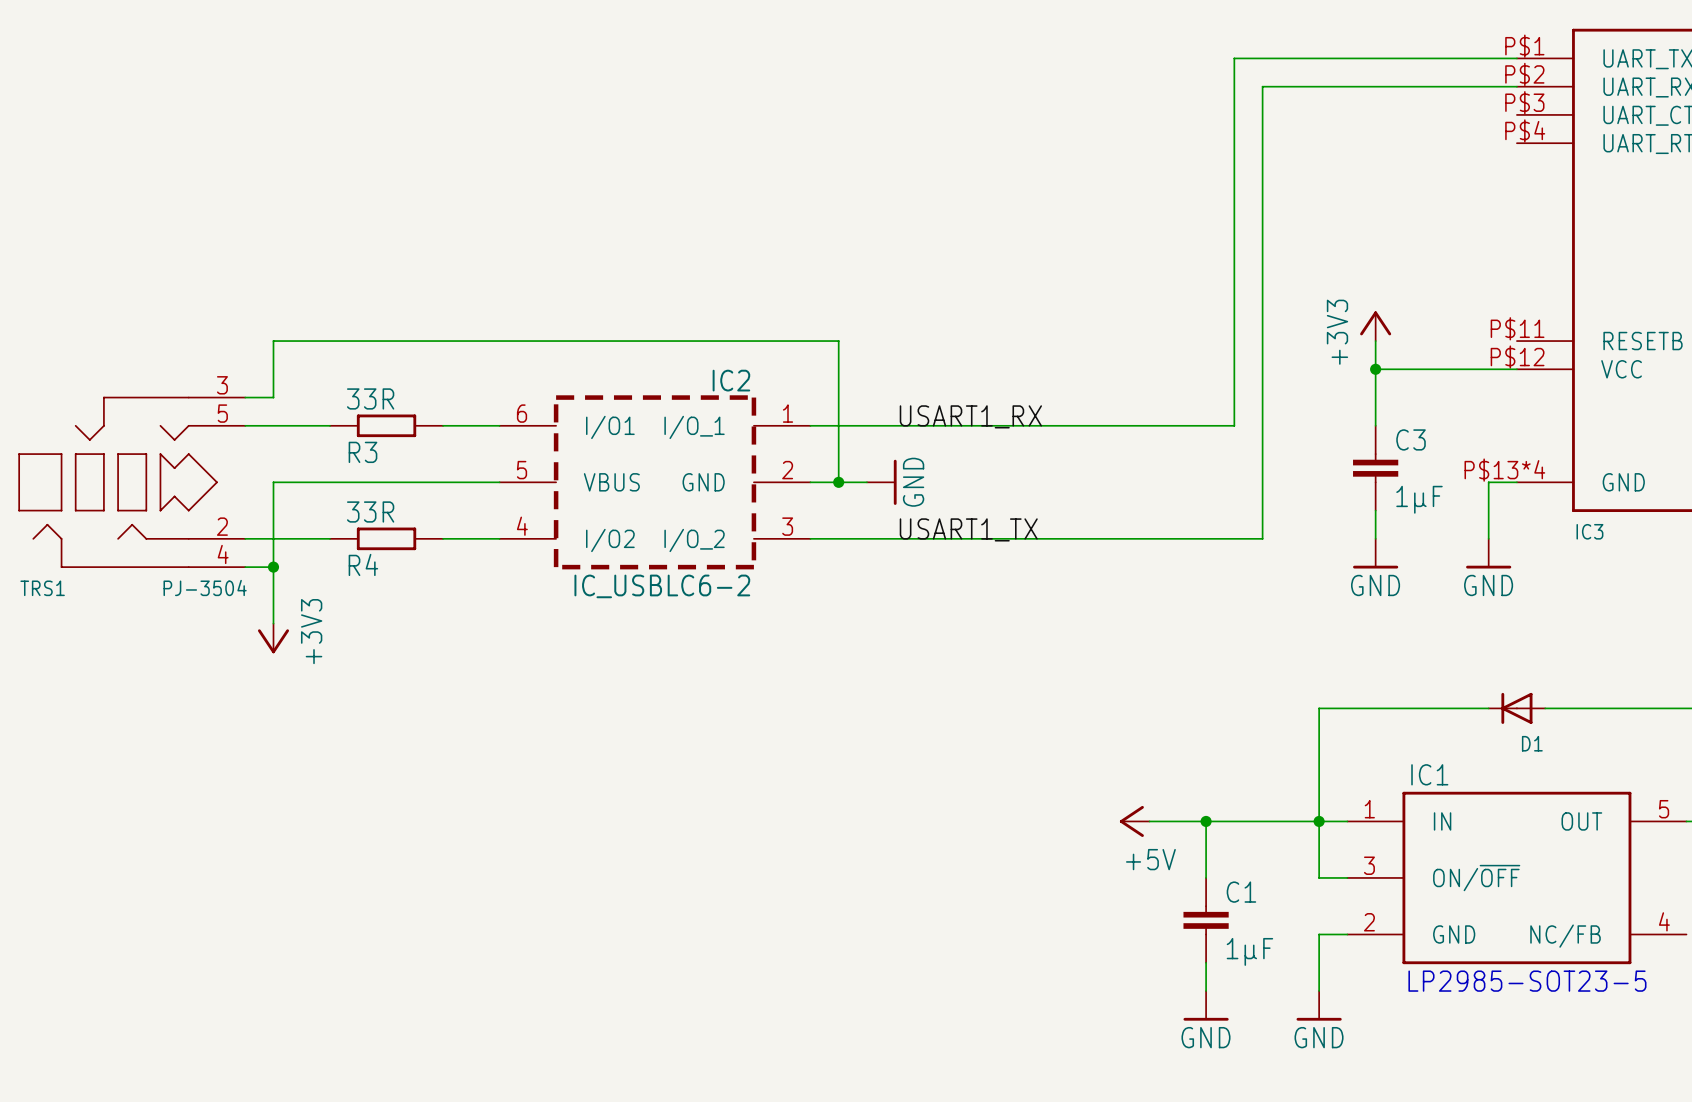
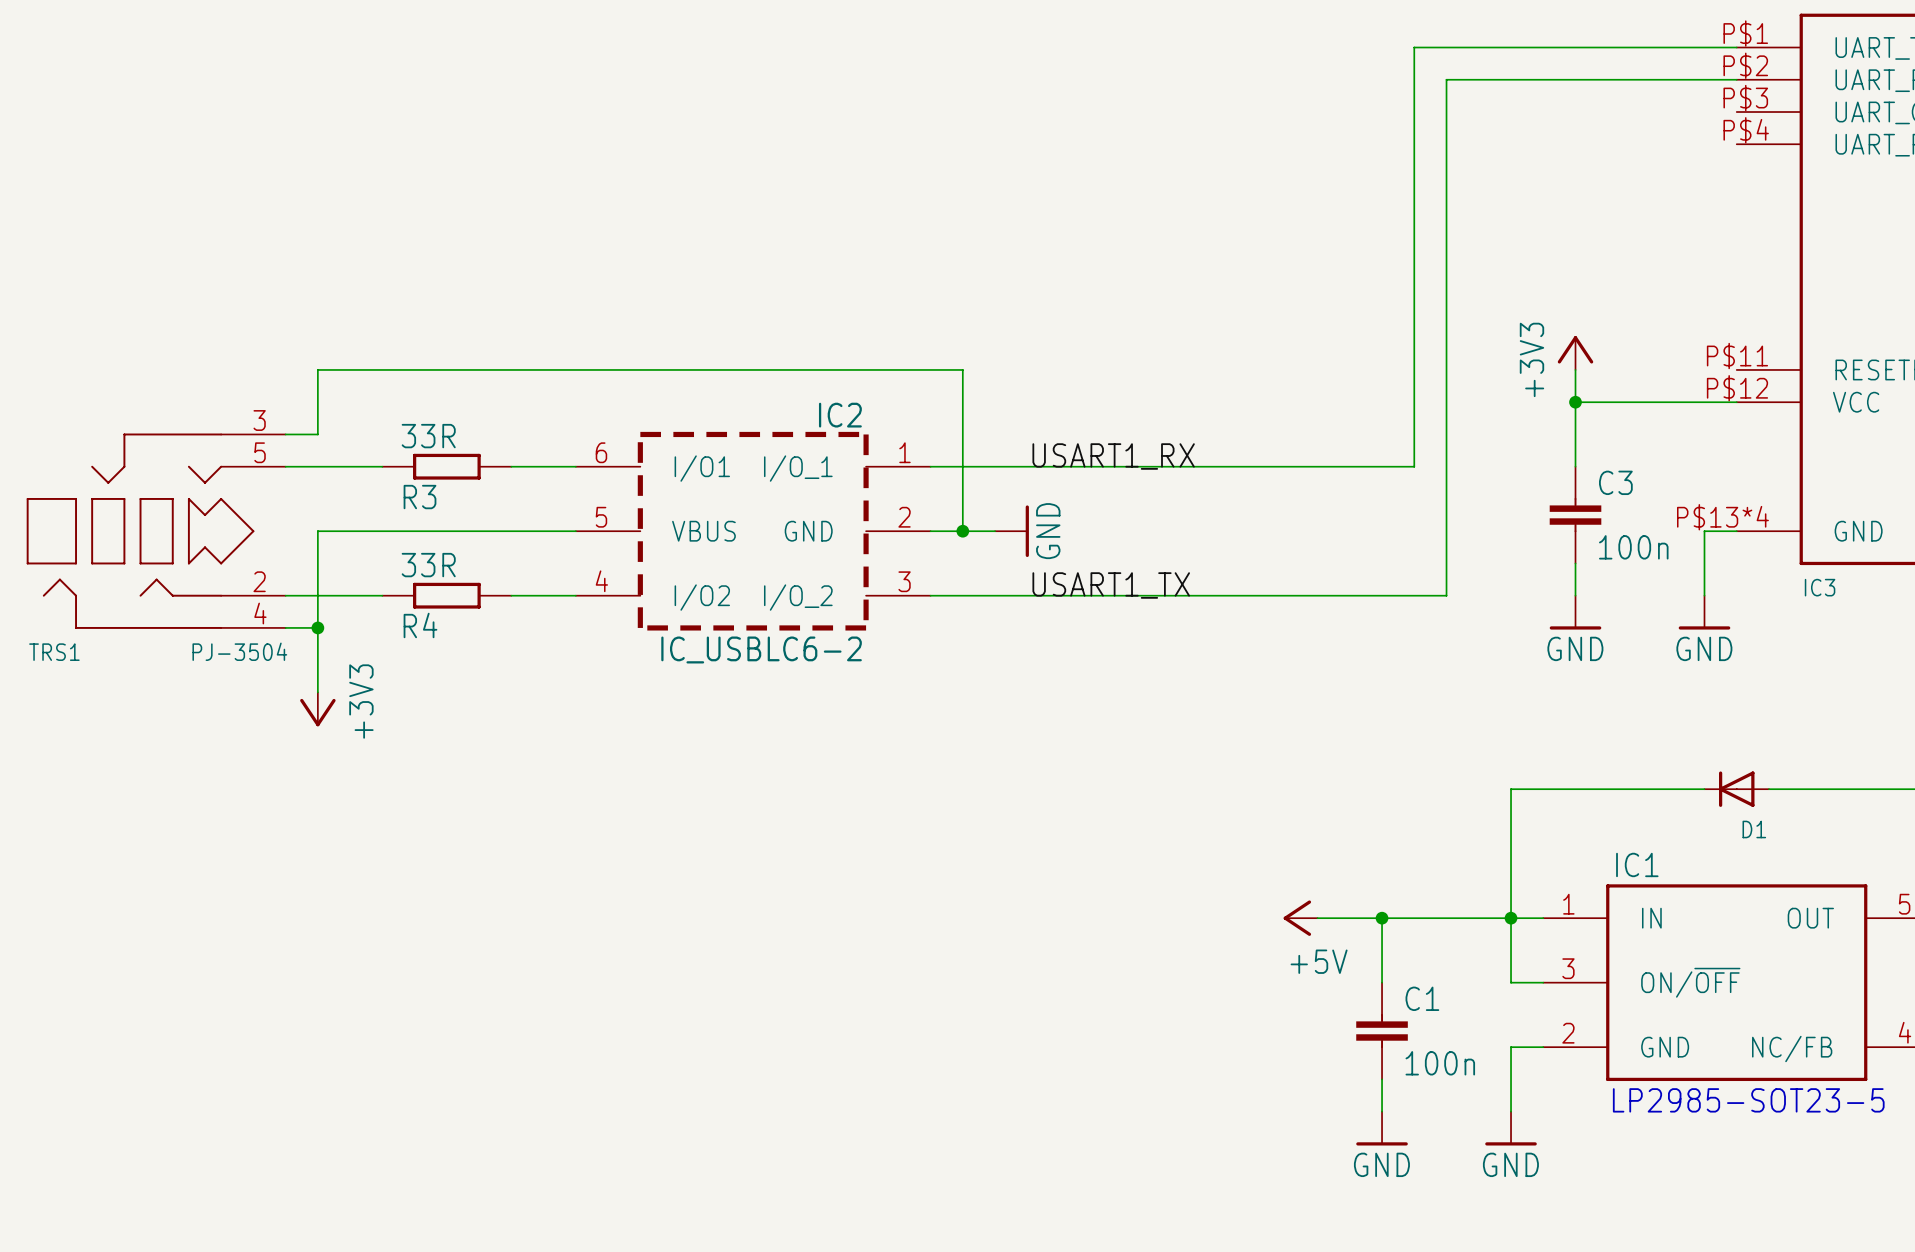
C3 value: 1µF (1419, 499) -> 100n (1633, 547)
C1 value: 1µF (1249, 951) -> 100n (1440, 1063)

